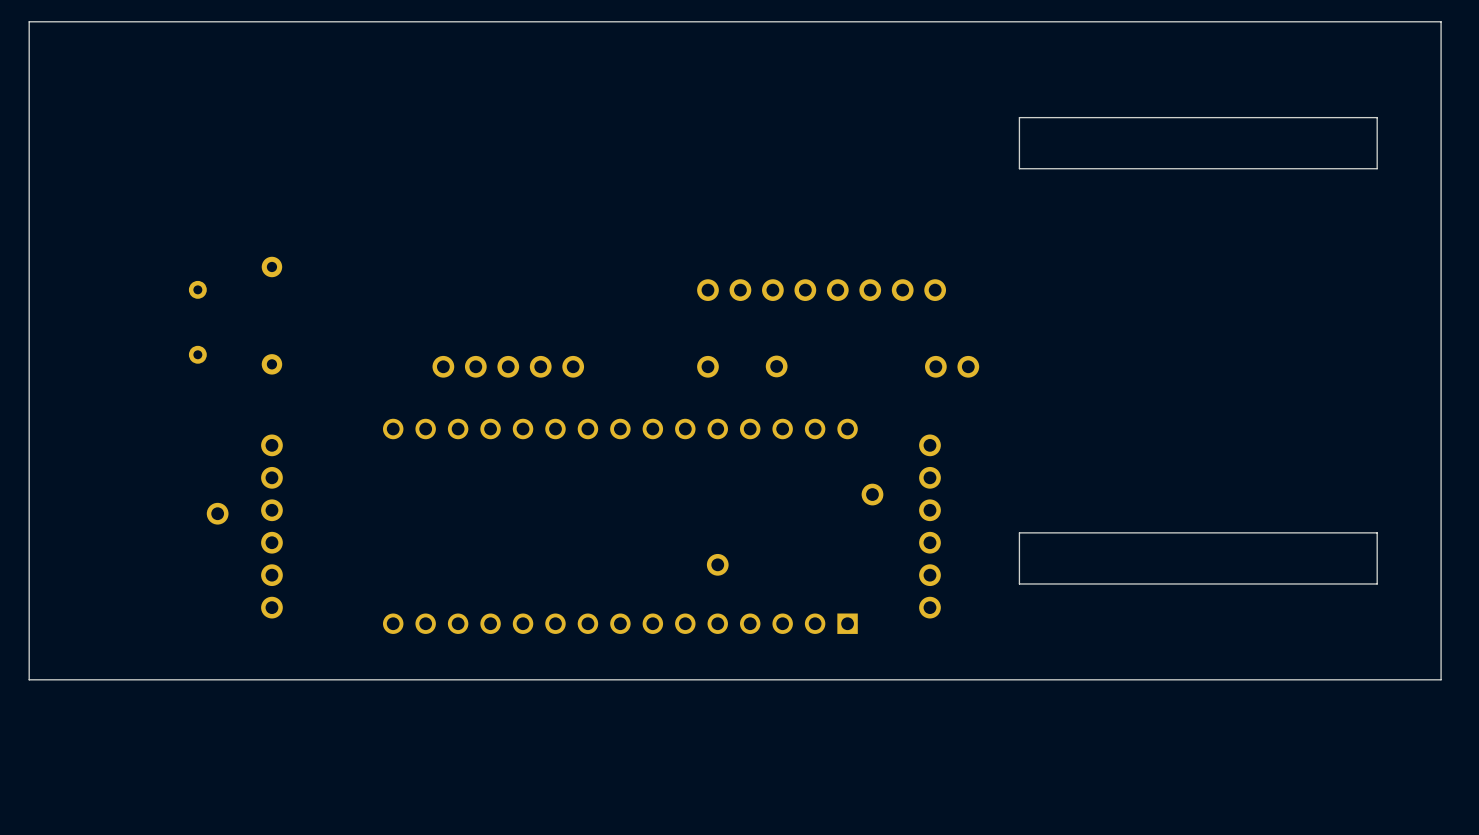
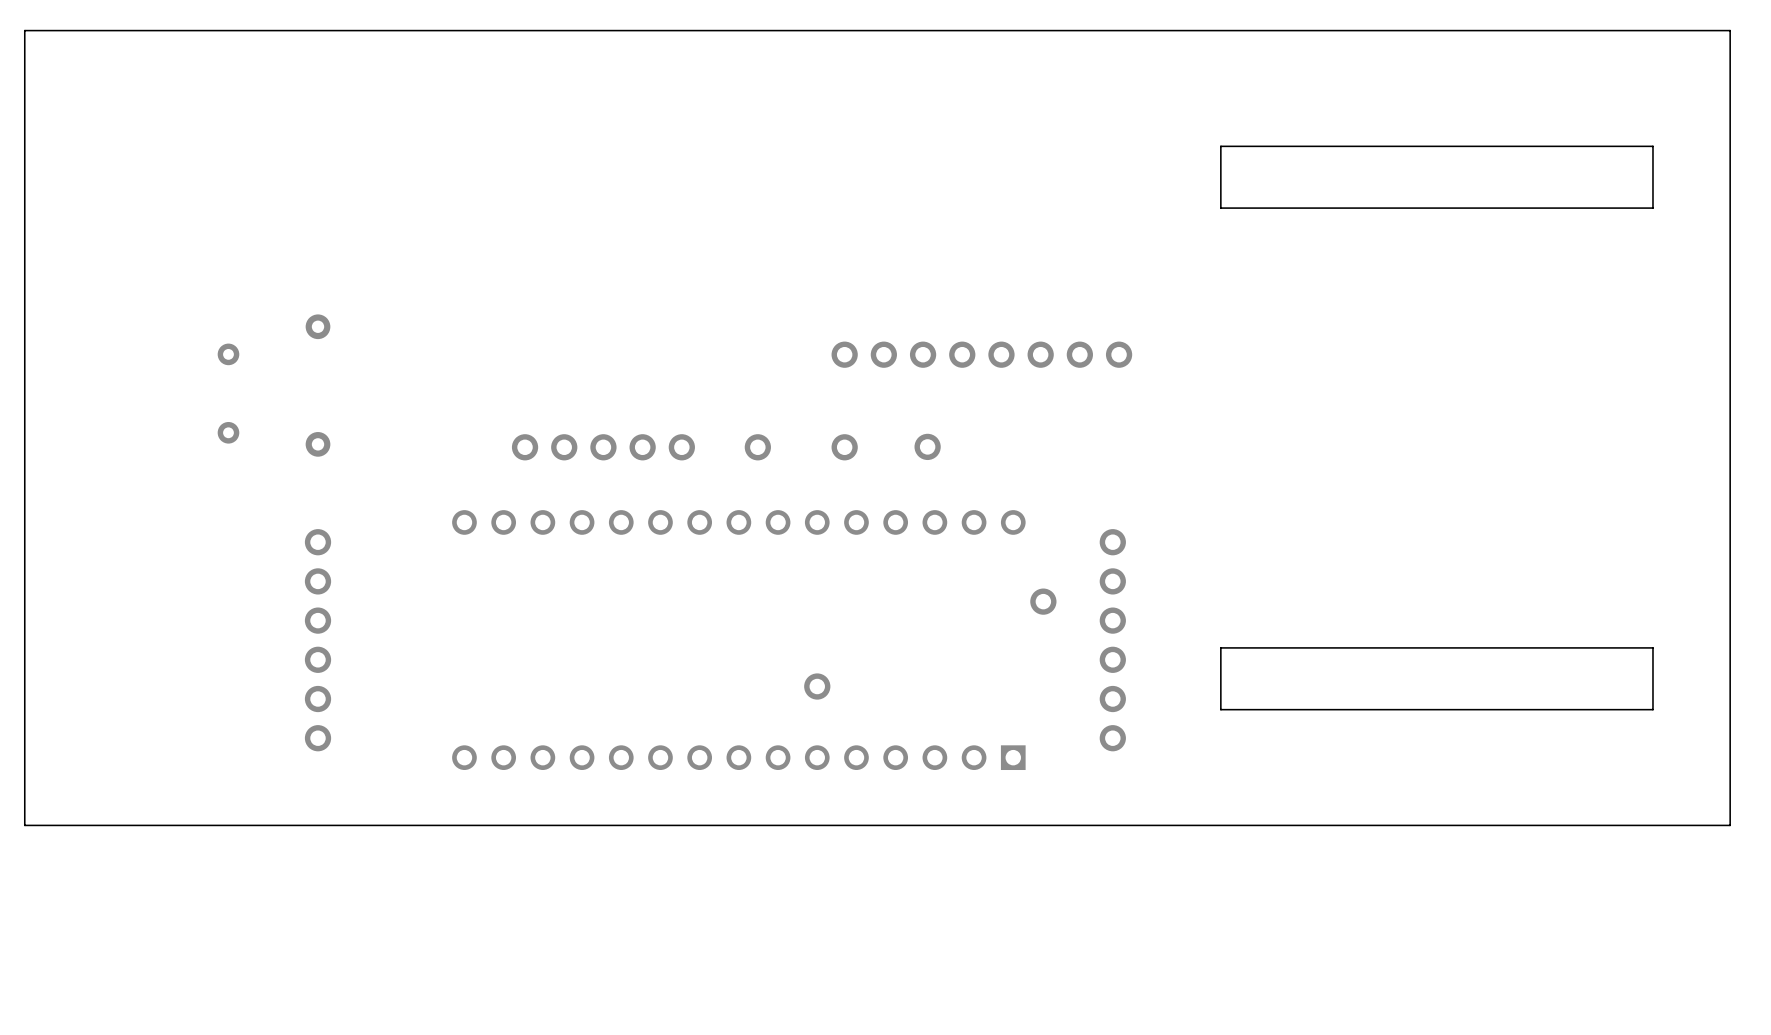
part: none -> (757, 447)
part: (952, 366) -> none
part: (217, 513) -> none
part position: (717, 564) -> (817, 686)

